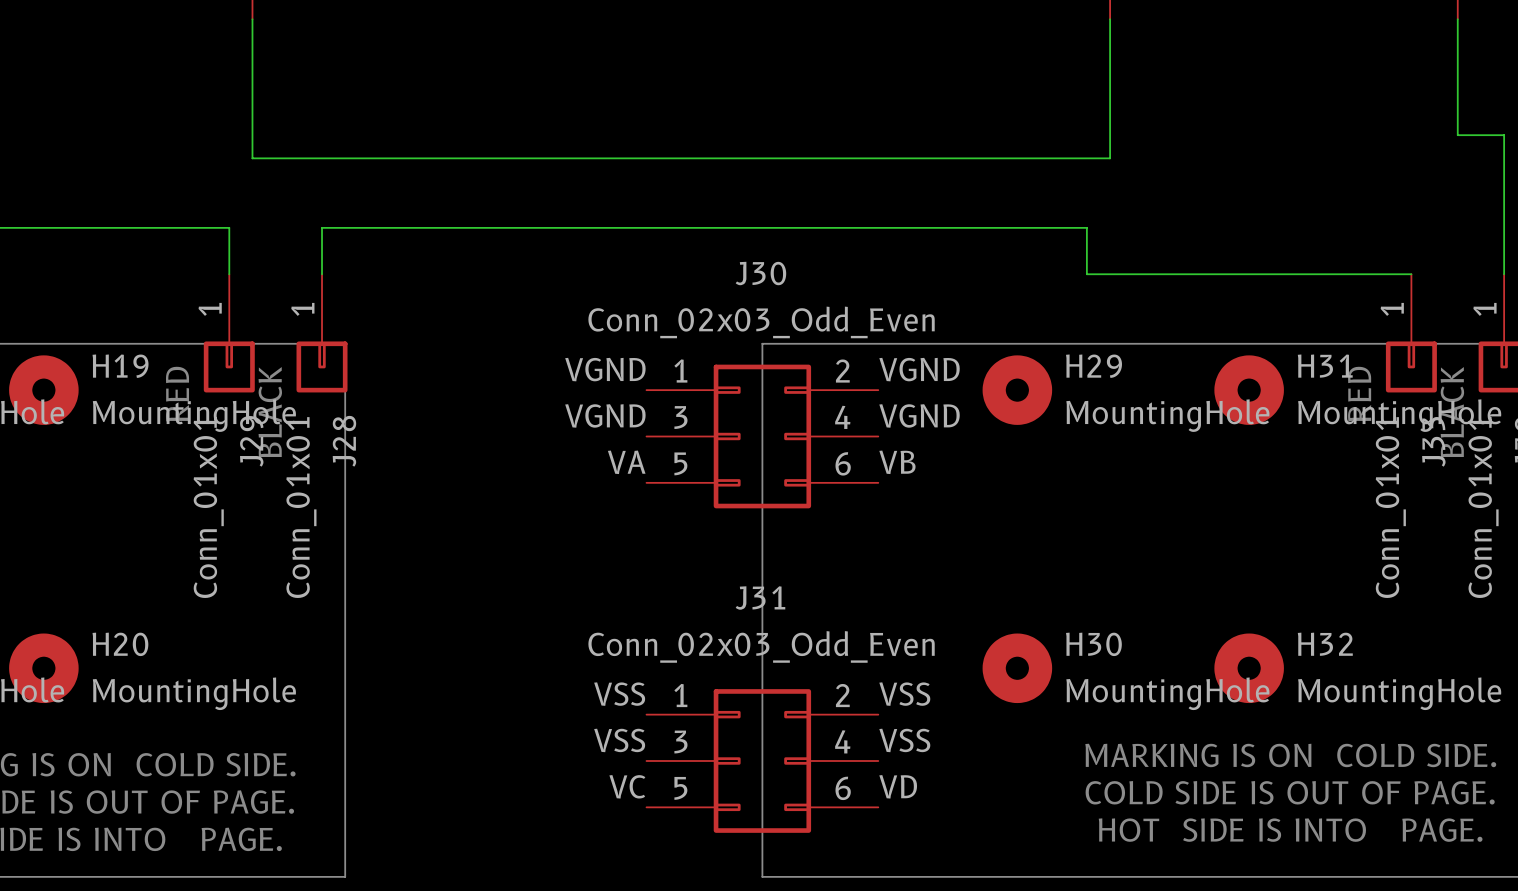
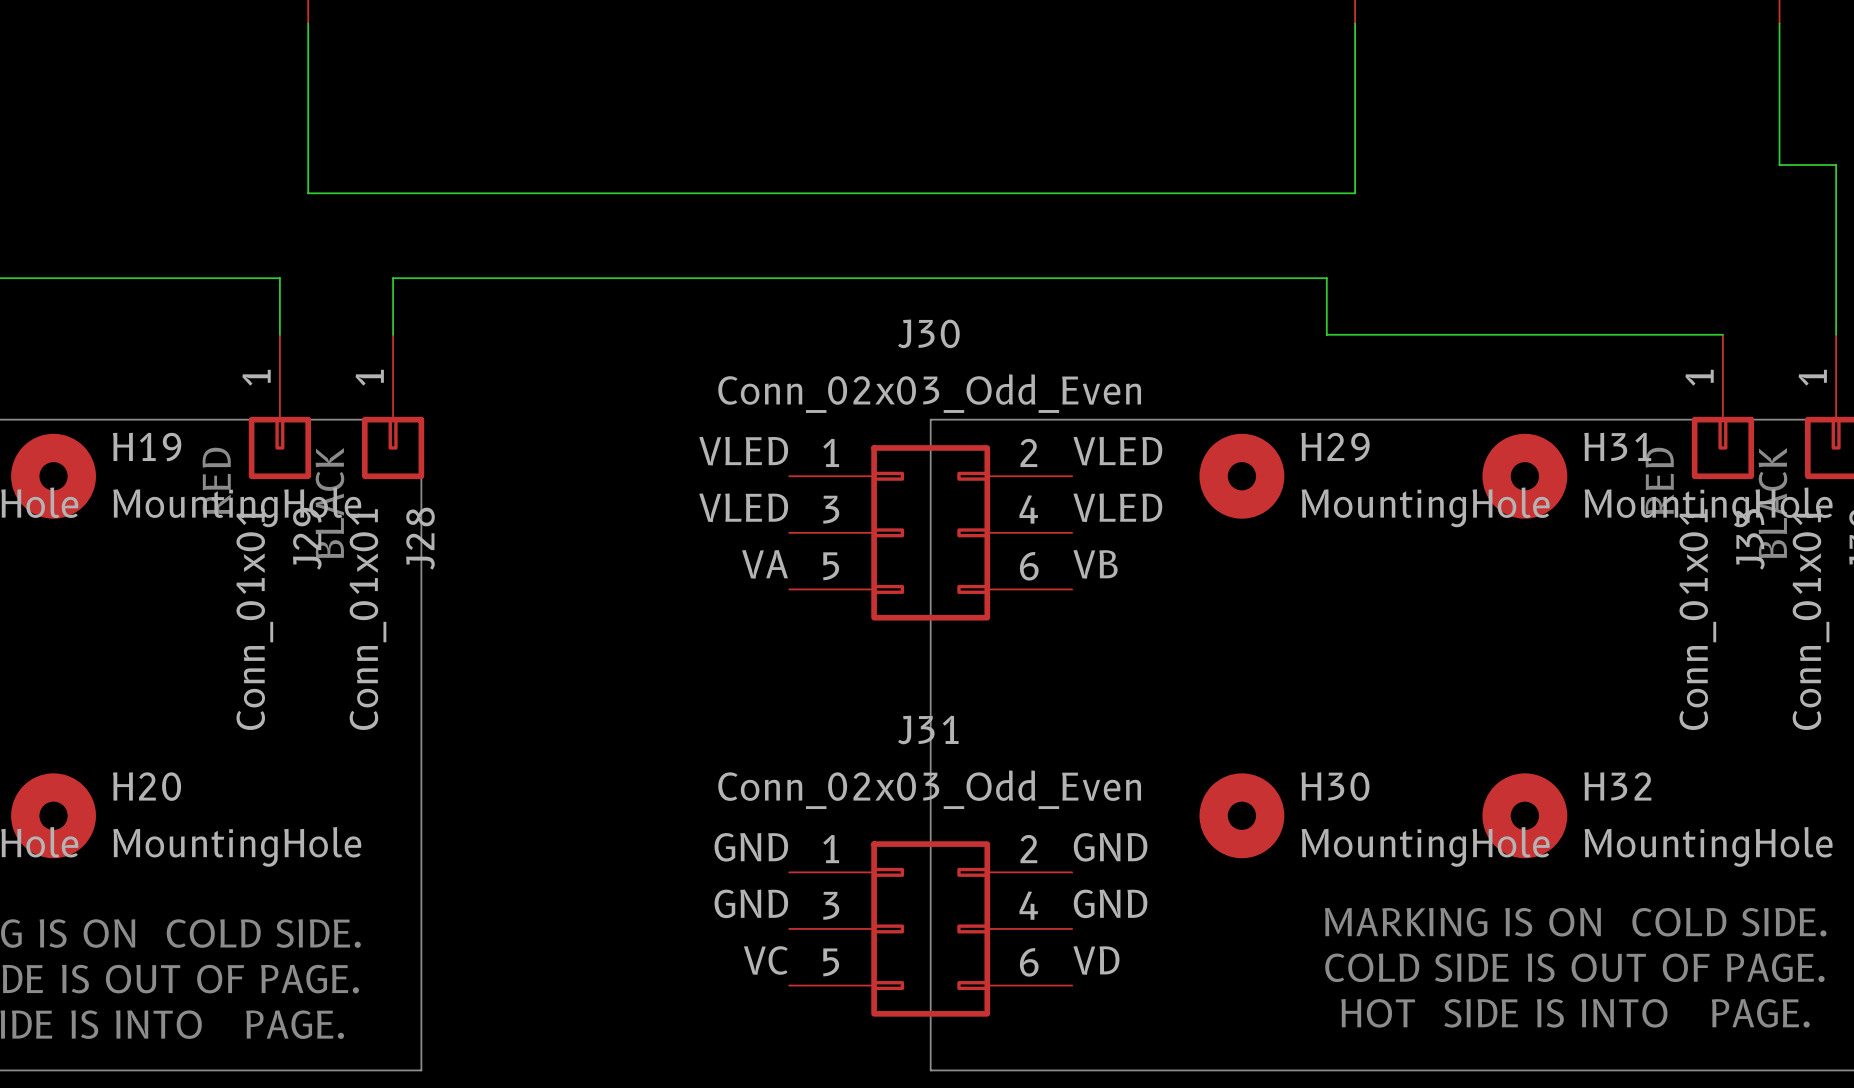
label: VGND (605, 369) -> VLED (743, 451)
label: VGND (919, 369) -> VLED (1117, 451)
label: VGND (605, 415) -> VLED (743, 507)
label: VGND (919, 415) -> VLED (1117, 507)
label: VSS (619, 694) -> GND (751, 847)
label: VSS (904, 694) -> GND (1110, 847)
label: VSS (619, 740) -> GND (751, 903)
label: VSS (904, 740) -> GND (1110, 903)

